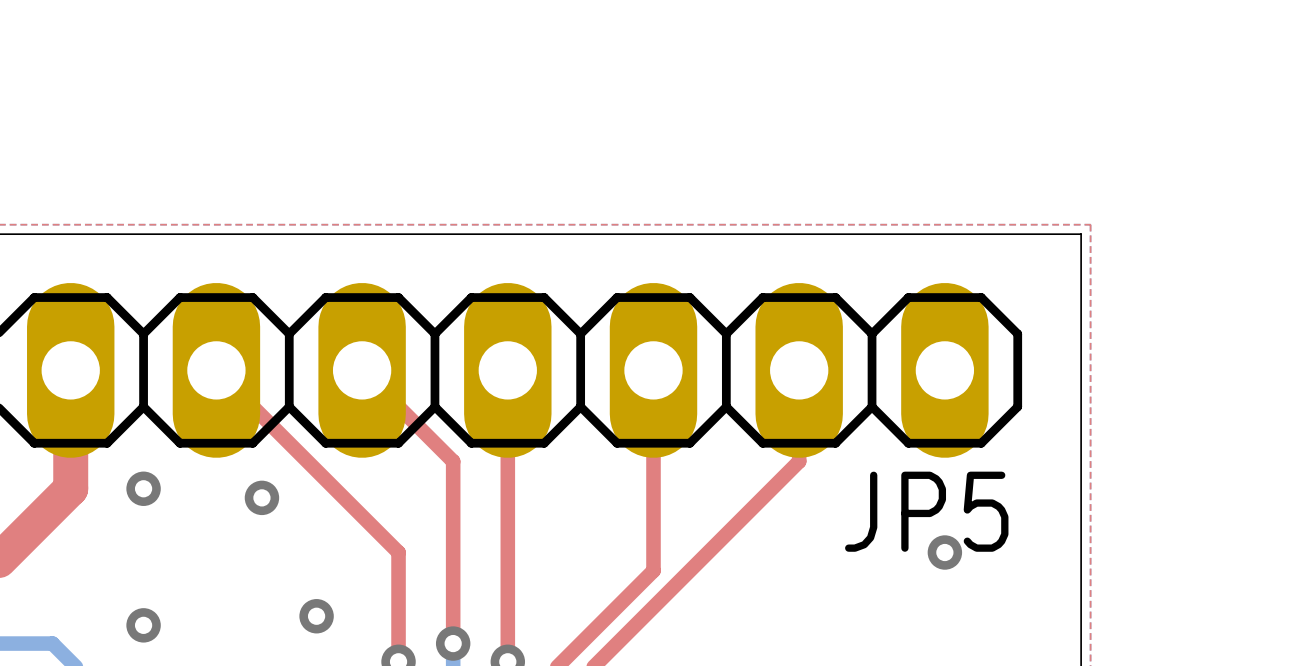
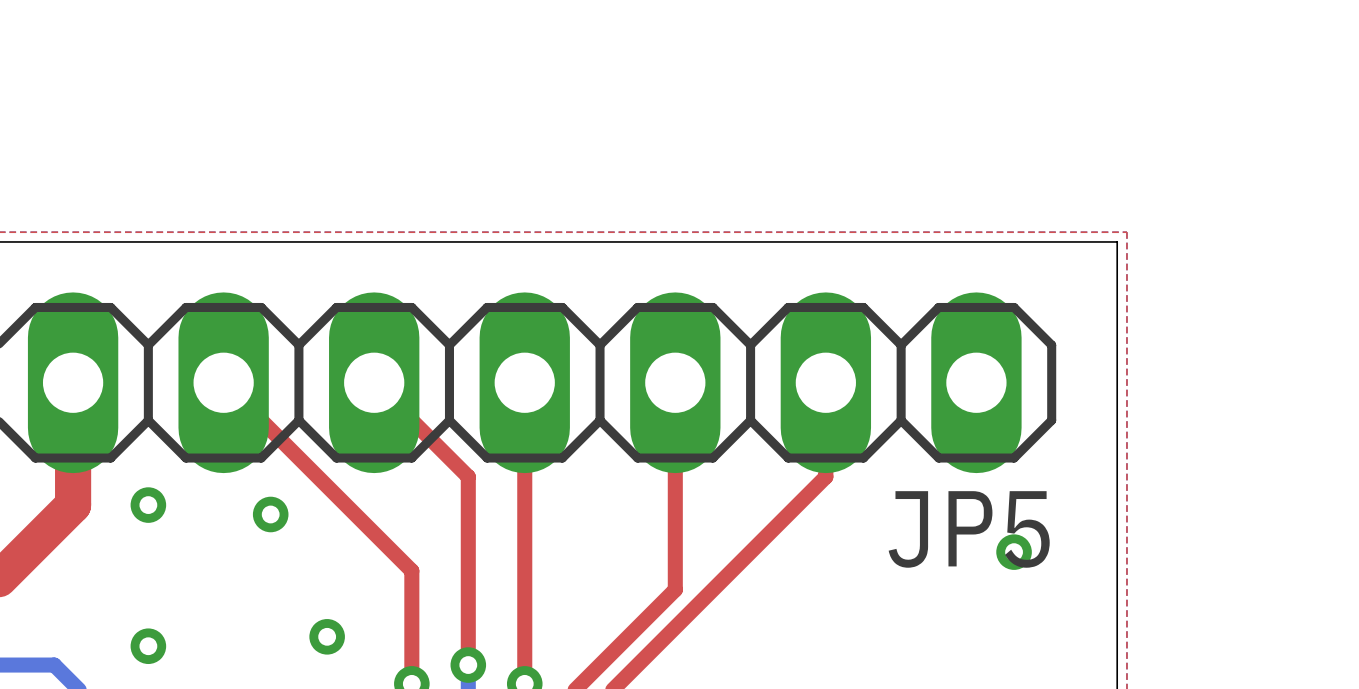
via position: (944, 552) -> (1014, 552)

